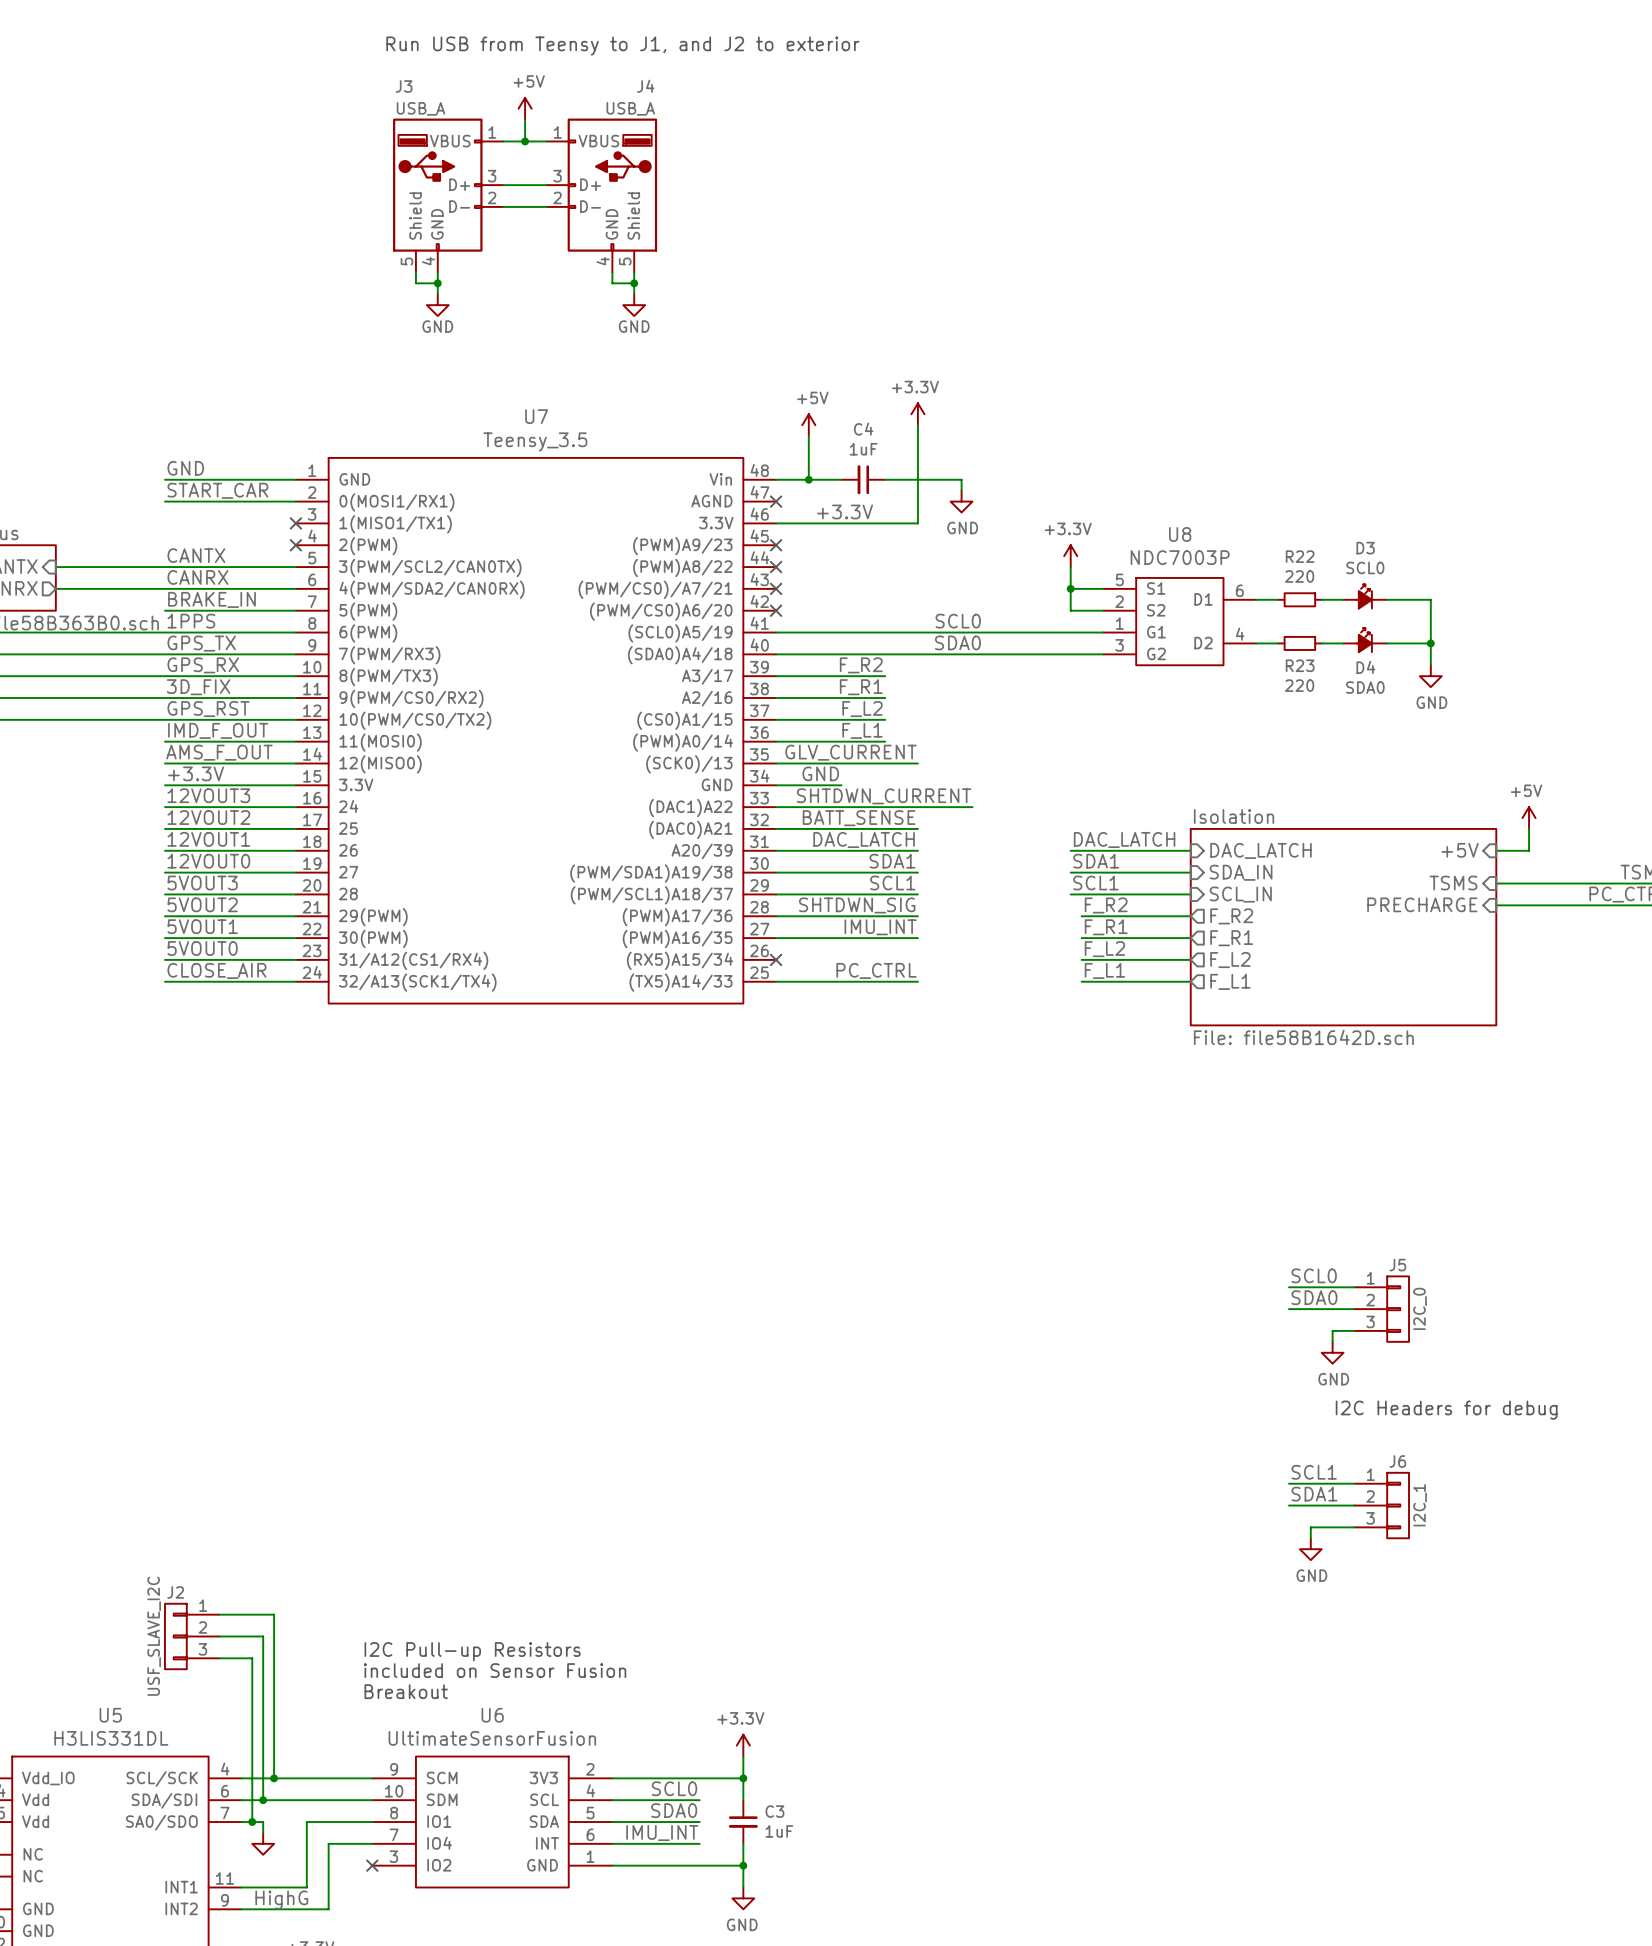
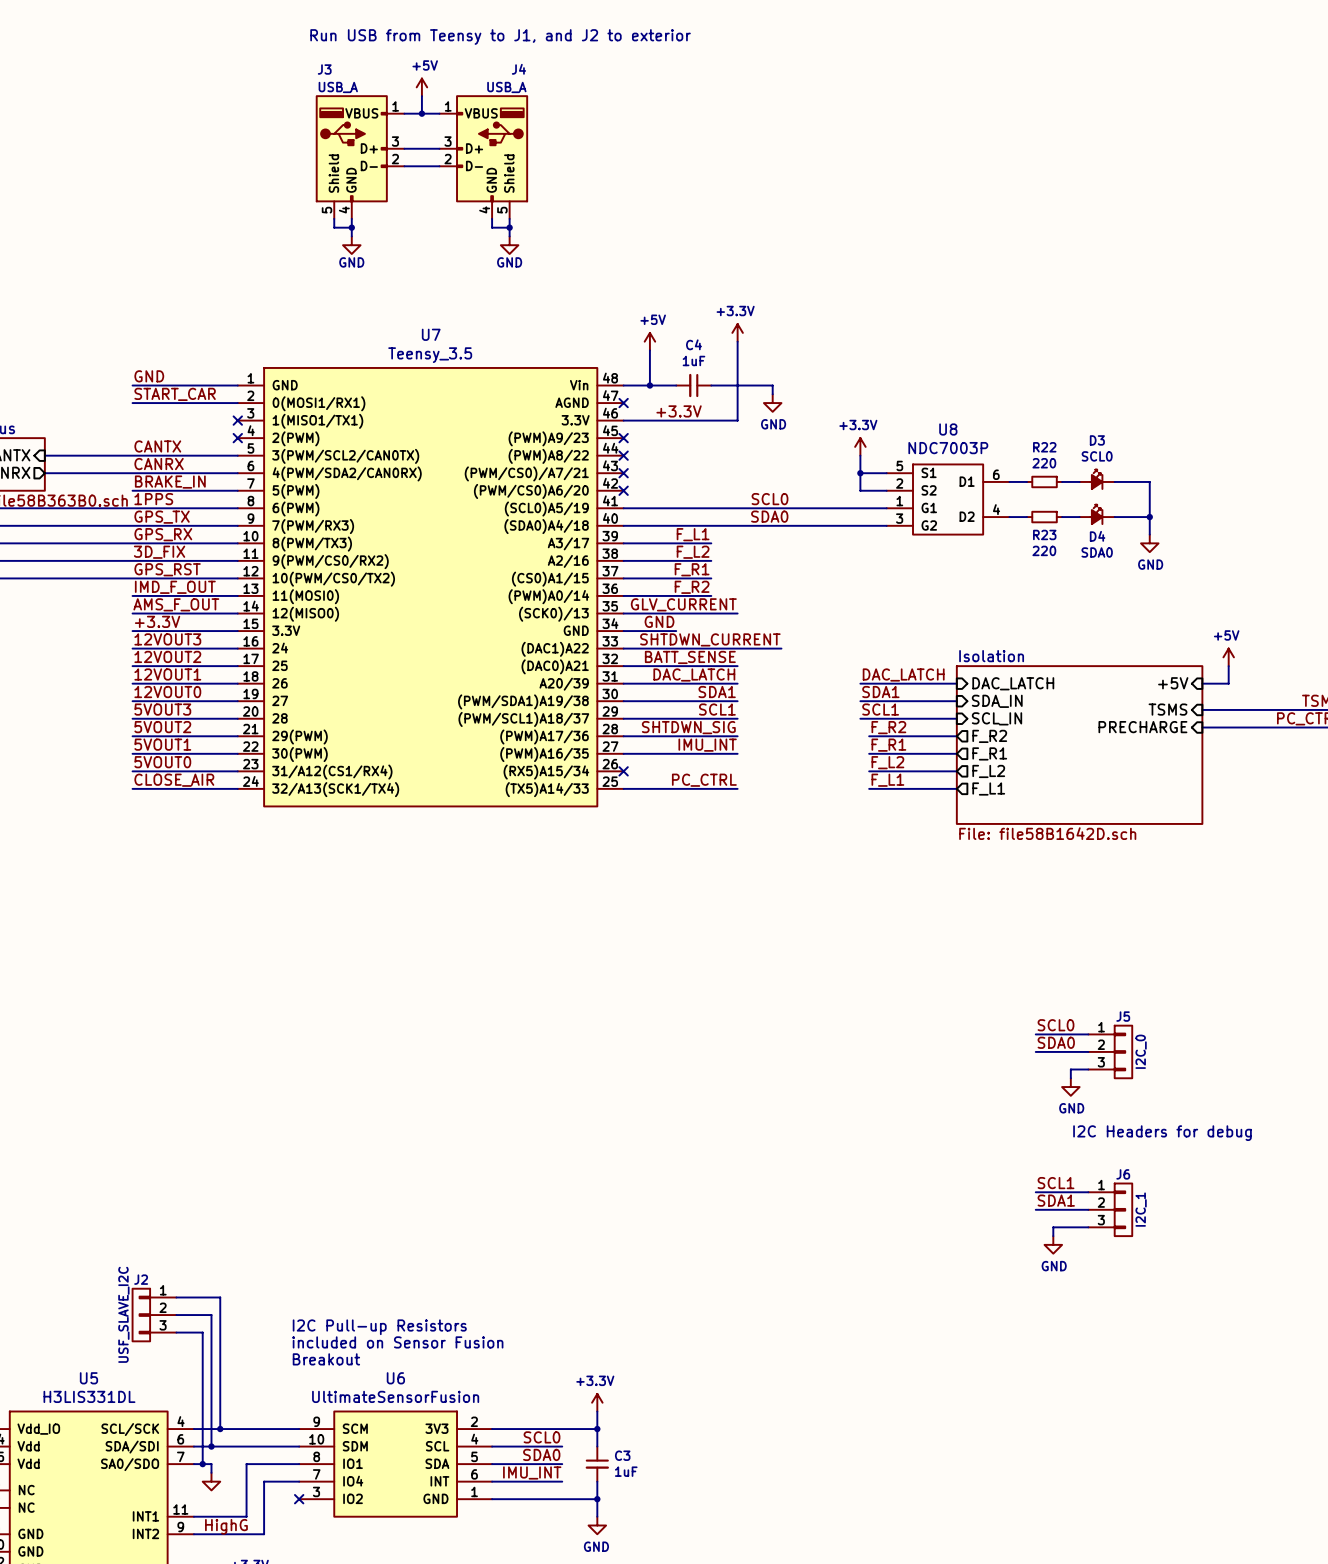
label: F_R2 (861, 665) -> F_L1 (693, 534)
label: F_R1 (861, 687) -> F_L2 (693, 552)
label: F_L2 (862, 709) -> F_R1 (692, 569)
label: F_L1 (862, 730) -> F_R2 (692, 587)

